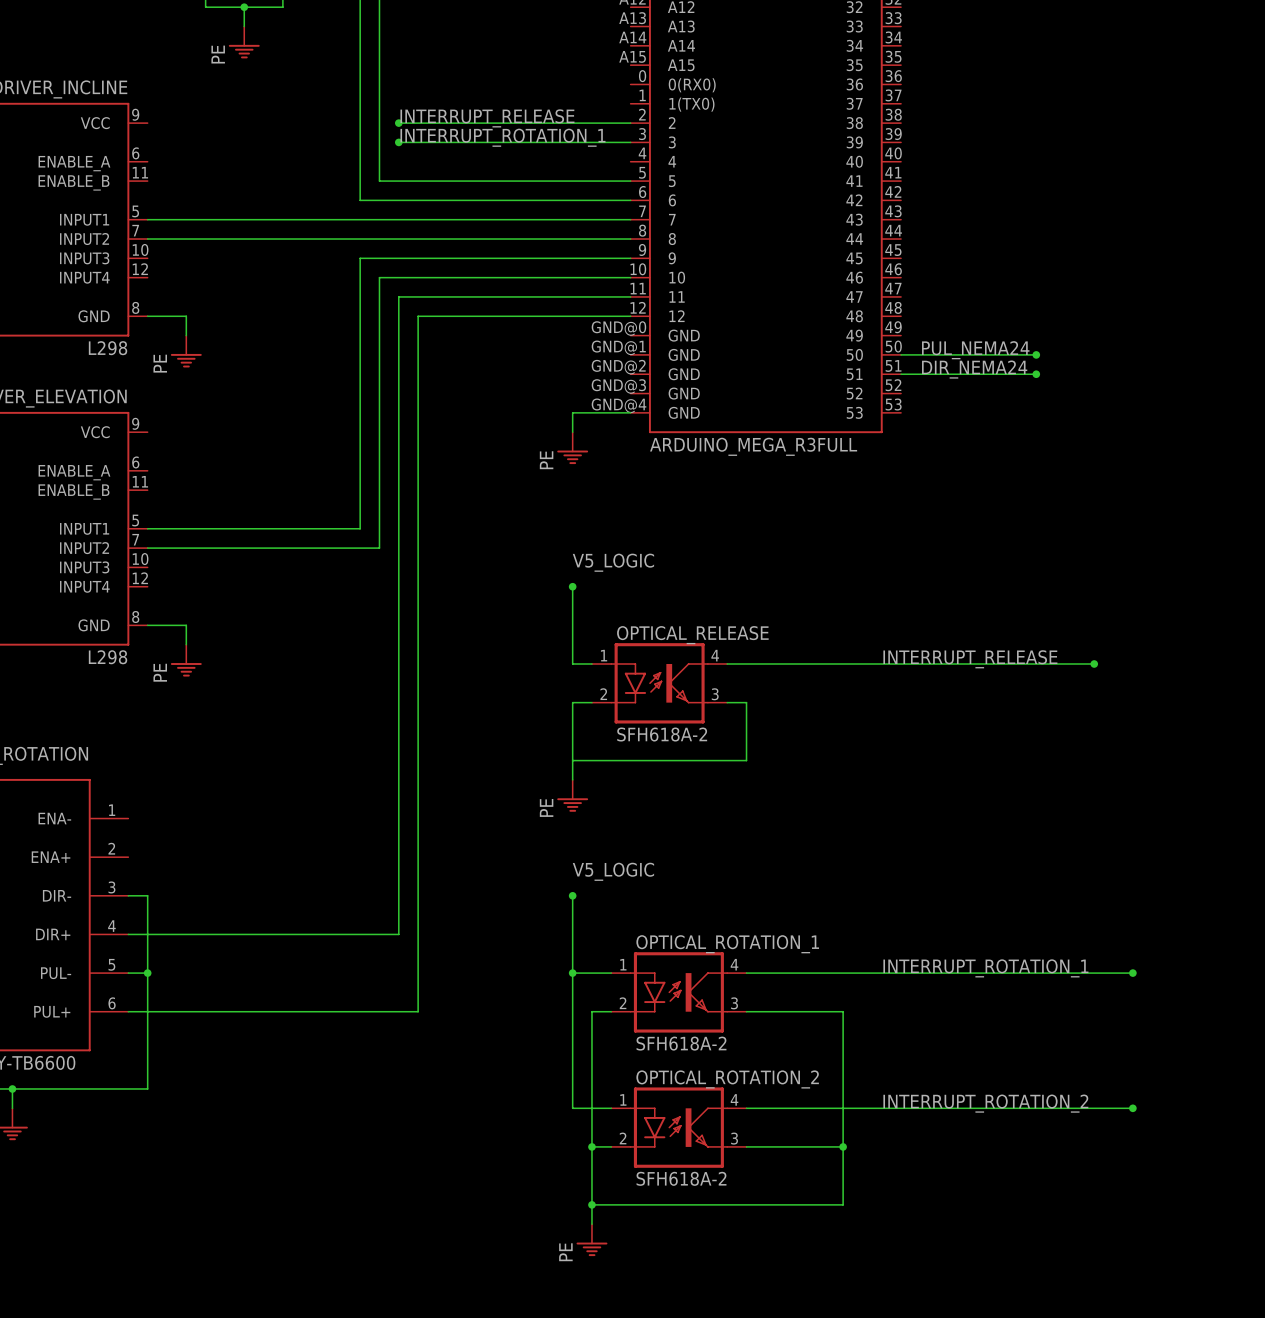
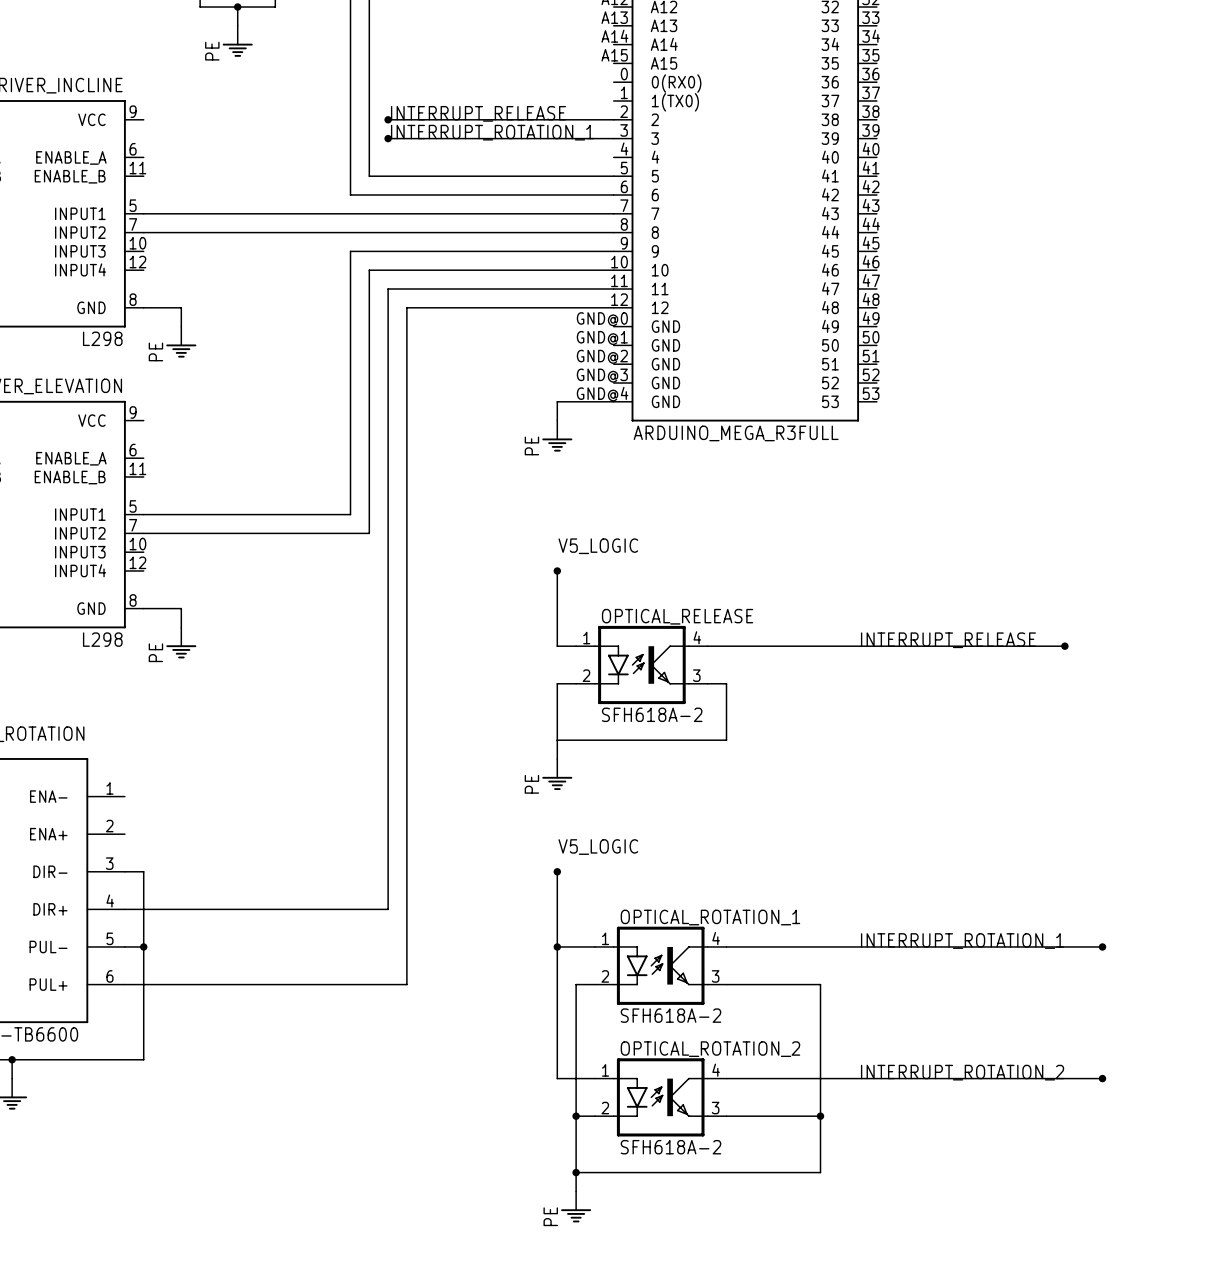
label: PUL_NEMA24 (975, 350) -> none
wire: (901, 354) (1036, 354) -> none
junction: (1036, 354) -> none
label: DIR_NEMA24 (974, 369) -> none
wire: (901, 374) (1036, 374) -> none
junction: (1036, 374) -> none

